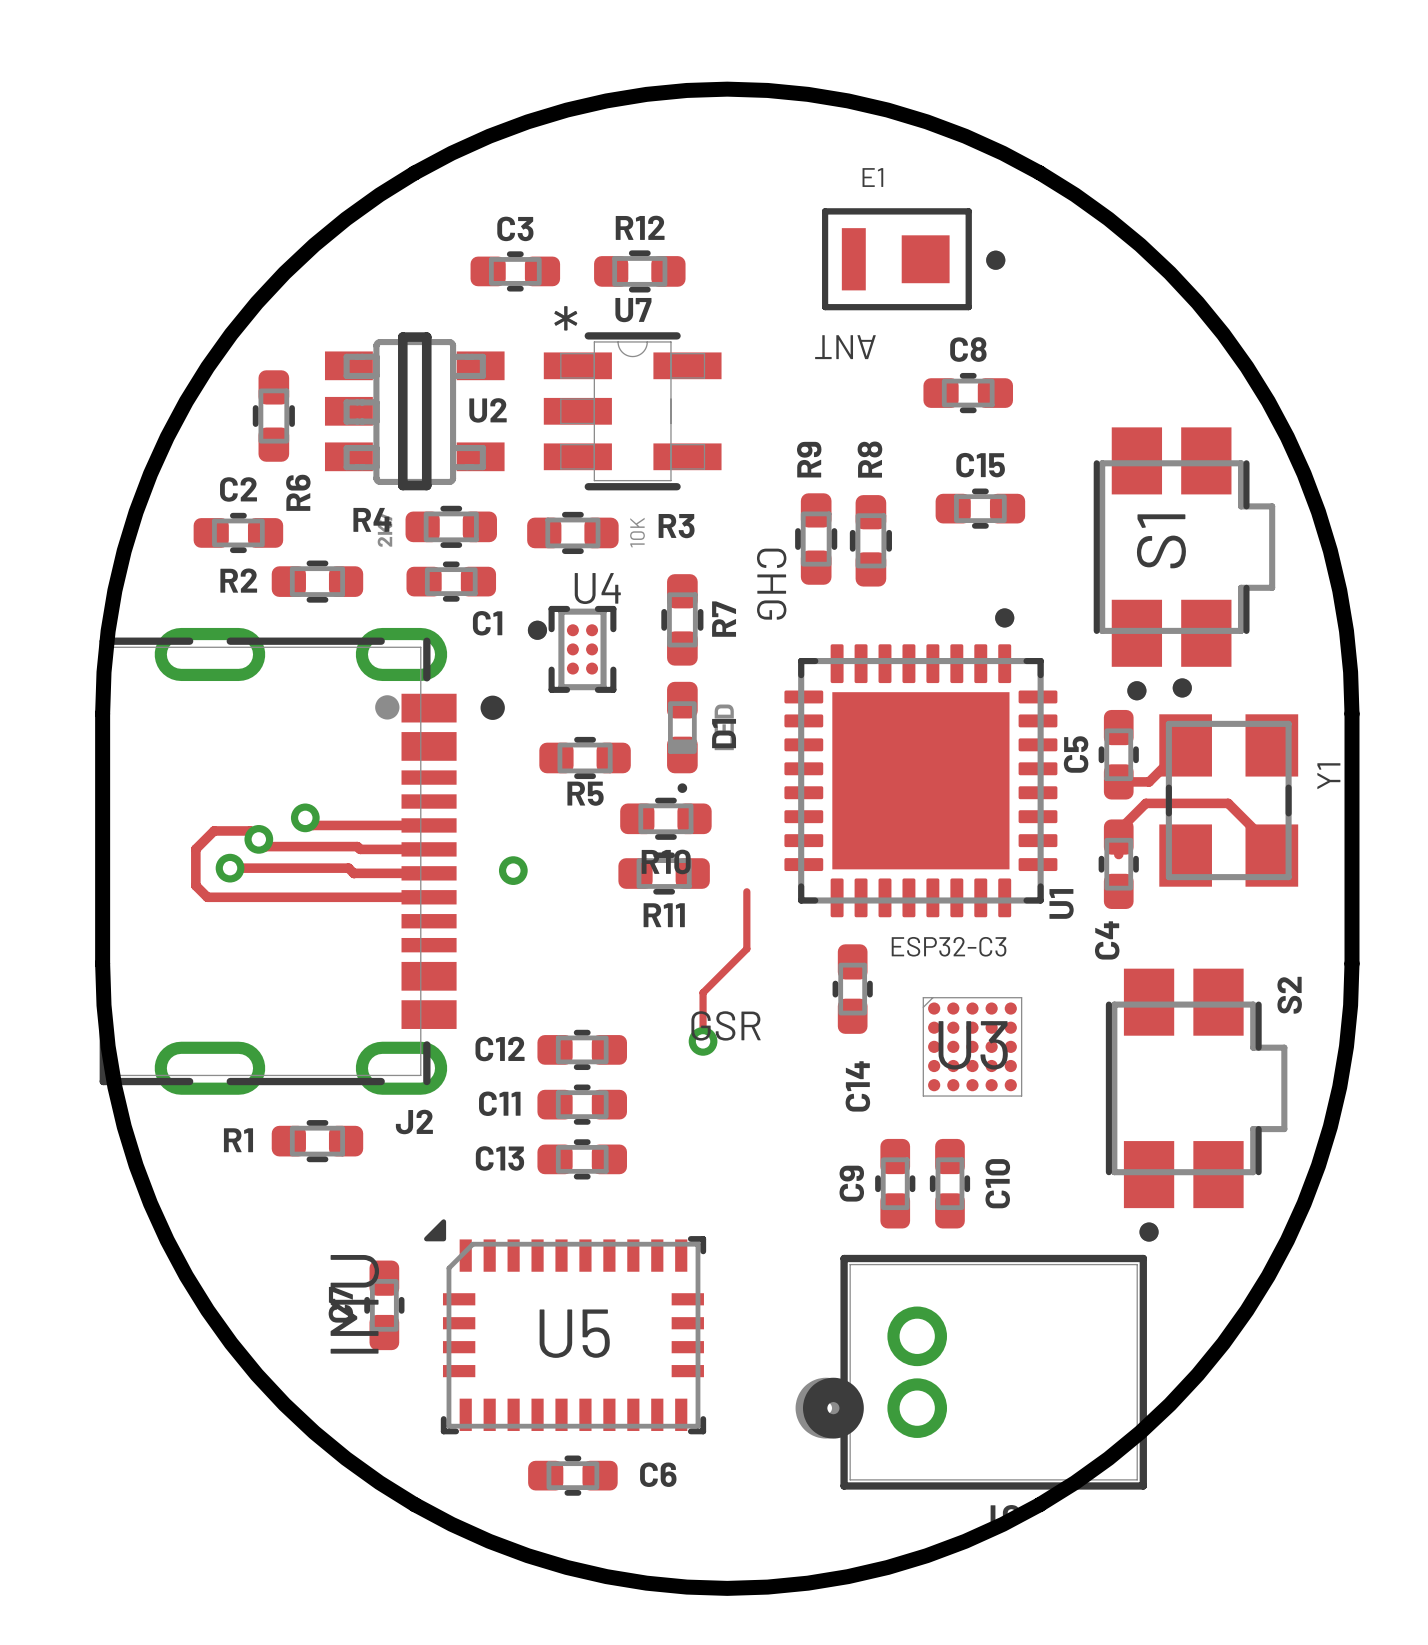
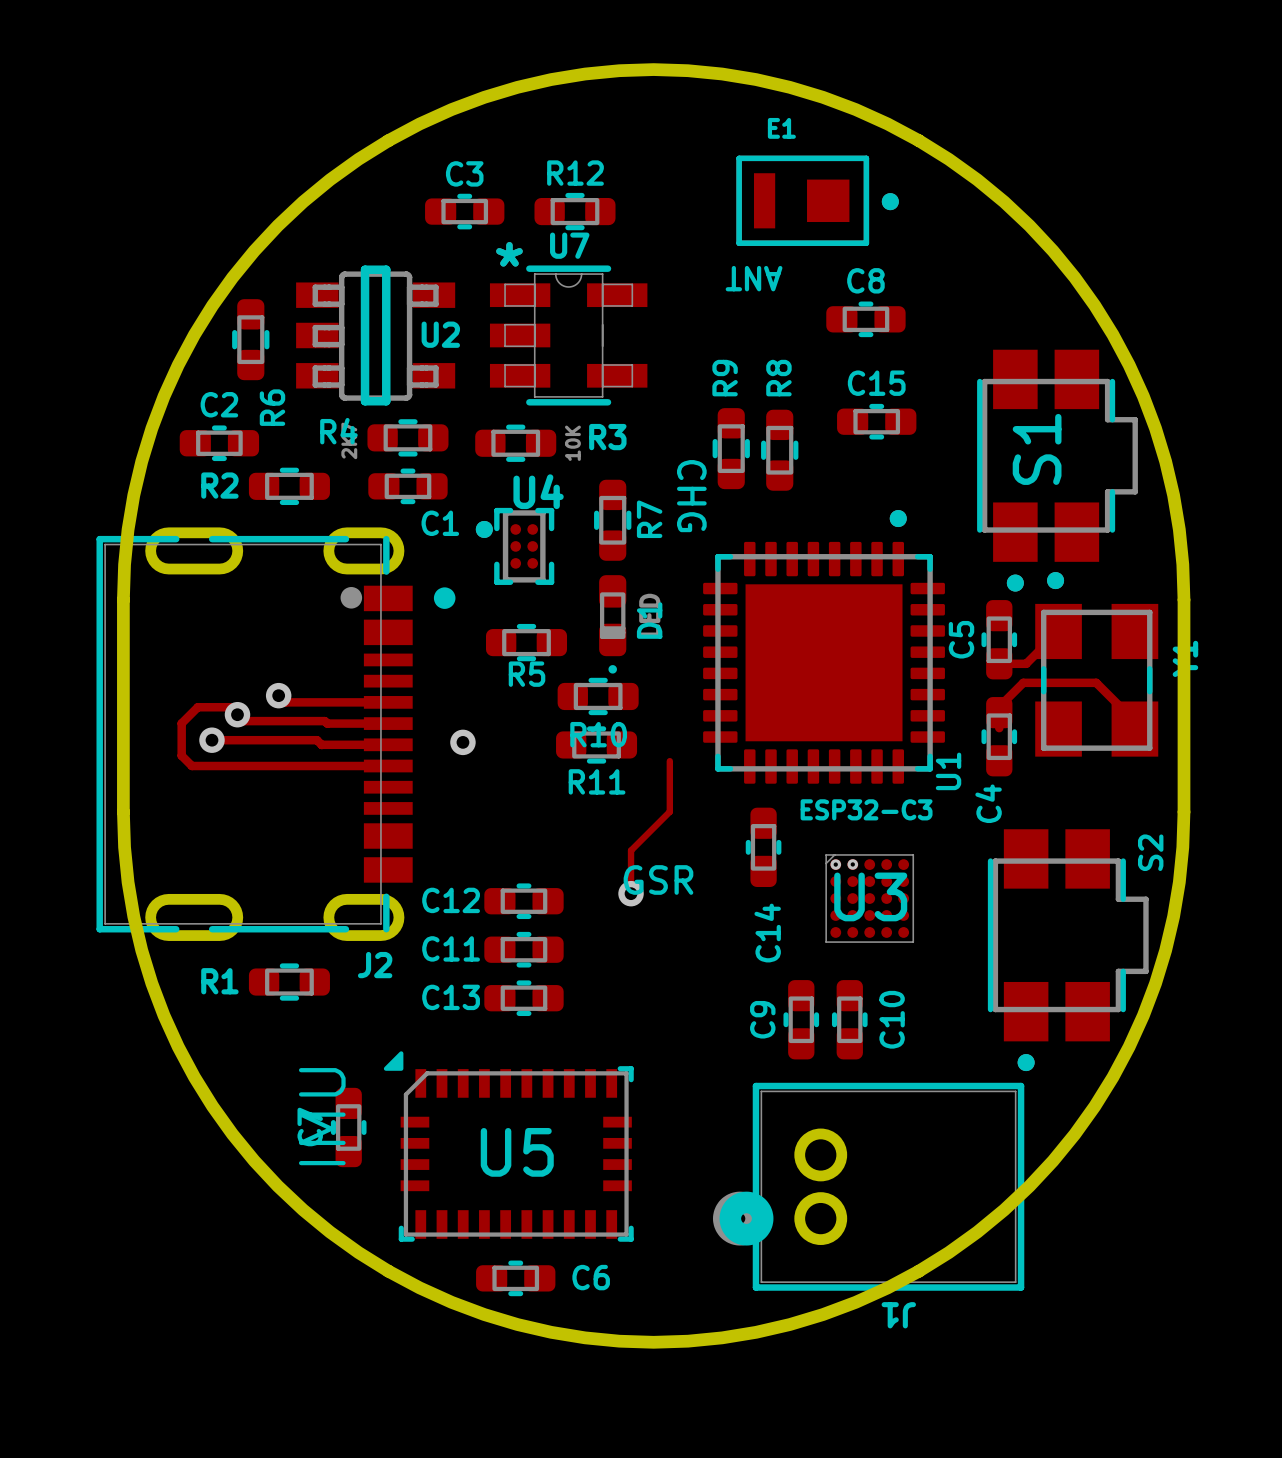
board edge: (414, 172) (379, 194) (314, 245) (284, 273) (231, 334) (207, 367) (167, 437) (136, 511) (124, 550) (108, 631) (104, 672) (104, 1005) (114, 1086) (124, 1126) (150, 1203) (167, 1240) (207, 1310) (256, 1374) (284, 1404) (346, 1458) (379, 1482) (414, 1504) (489, 1541) (527, 1555) (606, 1576) (646, 1583) (727, 1588) (808, 1583) (848, 1576) (926, 1555) (965, 1541) (1039, 1504) (1075, 1482) (1108, 1458) (1169, 1404) (1197, 1374) (1246, 1310) (1287, 1240) (1318, 1165) (1339, 1086) (1350, 1005) (1351, 713) (1350, 672) (1339, 590) (1330, 550) (1304, 474) (1268, 401) (1223, 334) (1169, 273) (1140, 245) (1075, 194) (1039, 172) (1002, 153) (926, 121) (887, 110) (808, 94) (727, 89) (646, 94) (566, 110) (527, 121) (451, 153) (414, 172) -> (388, 140) (358, 159) (303, 201) (277, 225) (232, 277) (212, 305) (178, 365) (151, 428) (141, 461) (128, 529) (124, 564) (124, 847) (133, 916) (141, 950) (164, 1015) (178, 1046) (212, 1106) (254, 1160) (277, 1186) (330, 1232) (358, 1252) (388, 1271) (451, 1302) (484, 1314) (551, 1332) (585, 1337) (653, 1342) (722, 1337) (756, 1332) (823, 1314) (855, 1302) (918, 1271) (948, 1252) (977, 1232) (1029, 1186) (1053, 1160) (1094, 1106) (1129, 1046) (1155, 983) (1173, 916) (1182, 847) (1183, 599) (1182, 564) (1173, 495) (1165, 461) (1143, 396) (1112, 334) (1074, 277) (1029, 225) (1004, 201) (948, 159) (918, 140) (887, 123) (823, 97) (789, 87) (722, 74) (653, 69) (585, 74) (517, 87) (484, 97) (419, 123) (388, 140)
via: none -> (835, 864)
via: none -> (852, 864)

